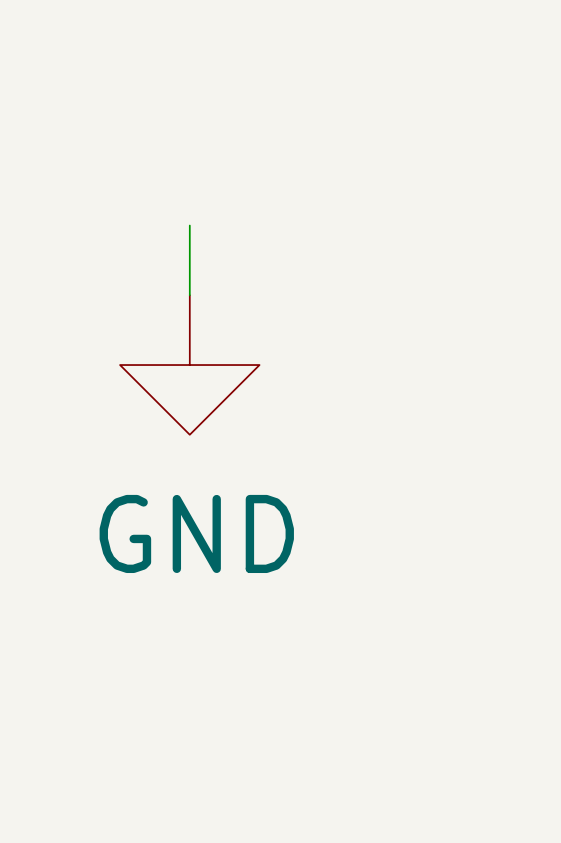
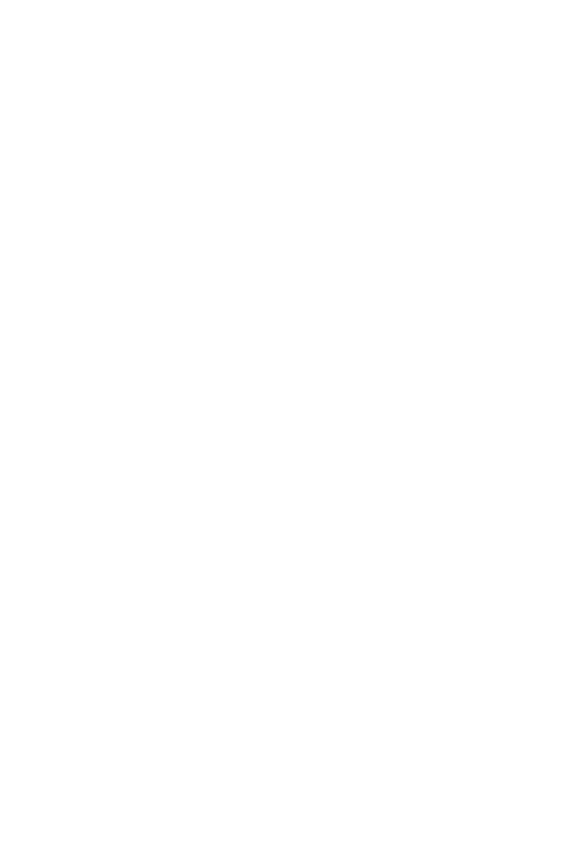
wire: (189, 225) (189, 295) -> none
power symbol: GND (189, 365) -> none

